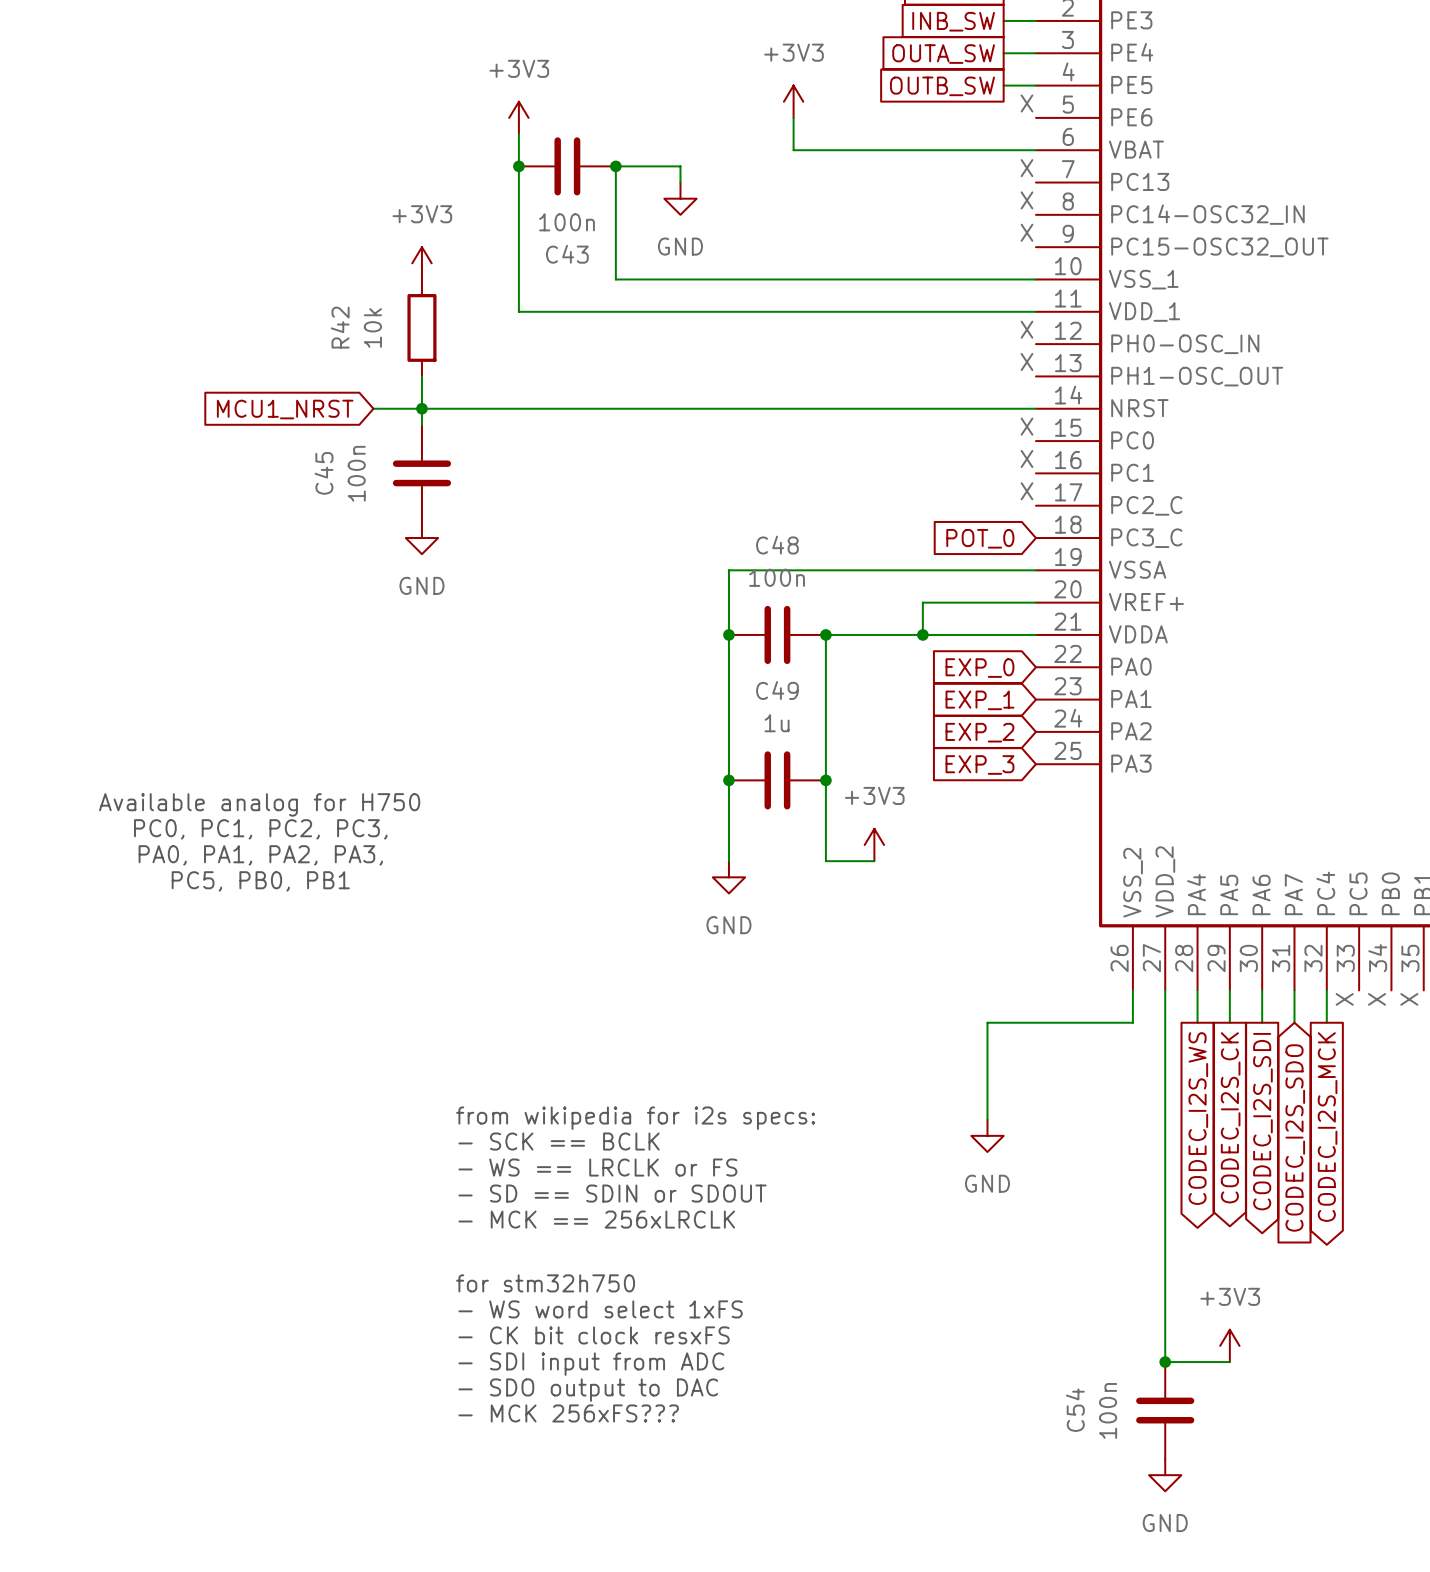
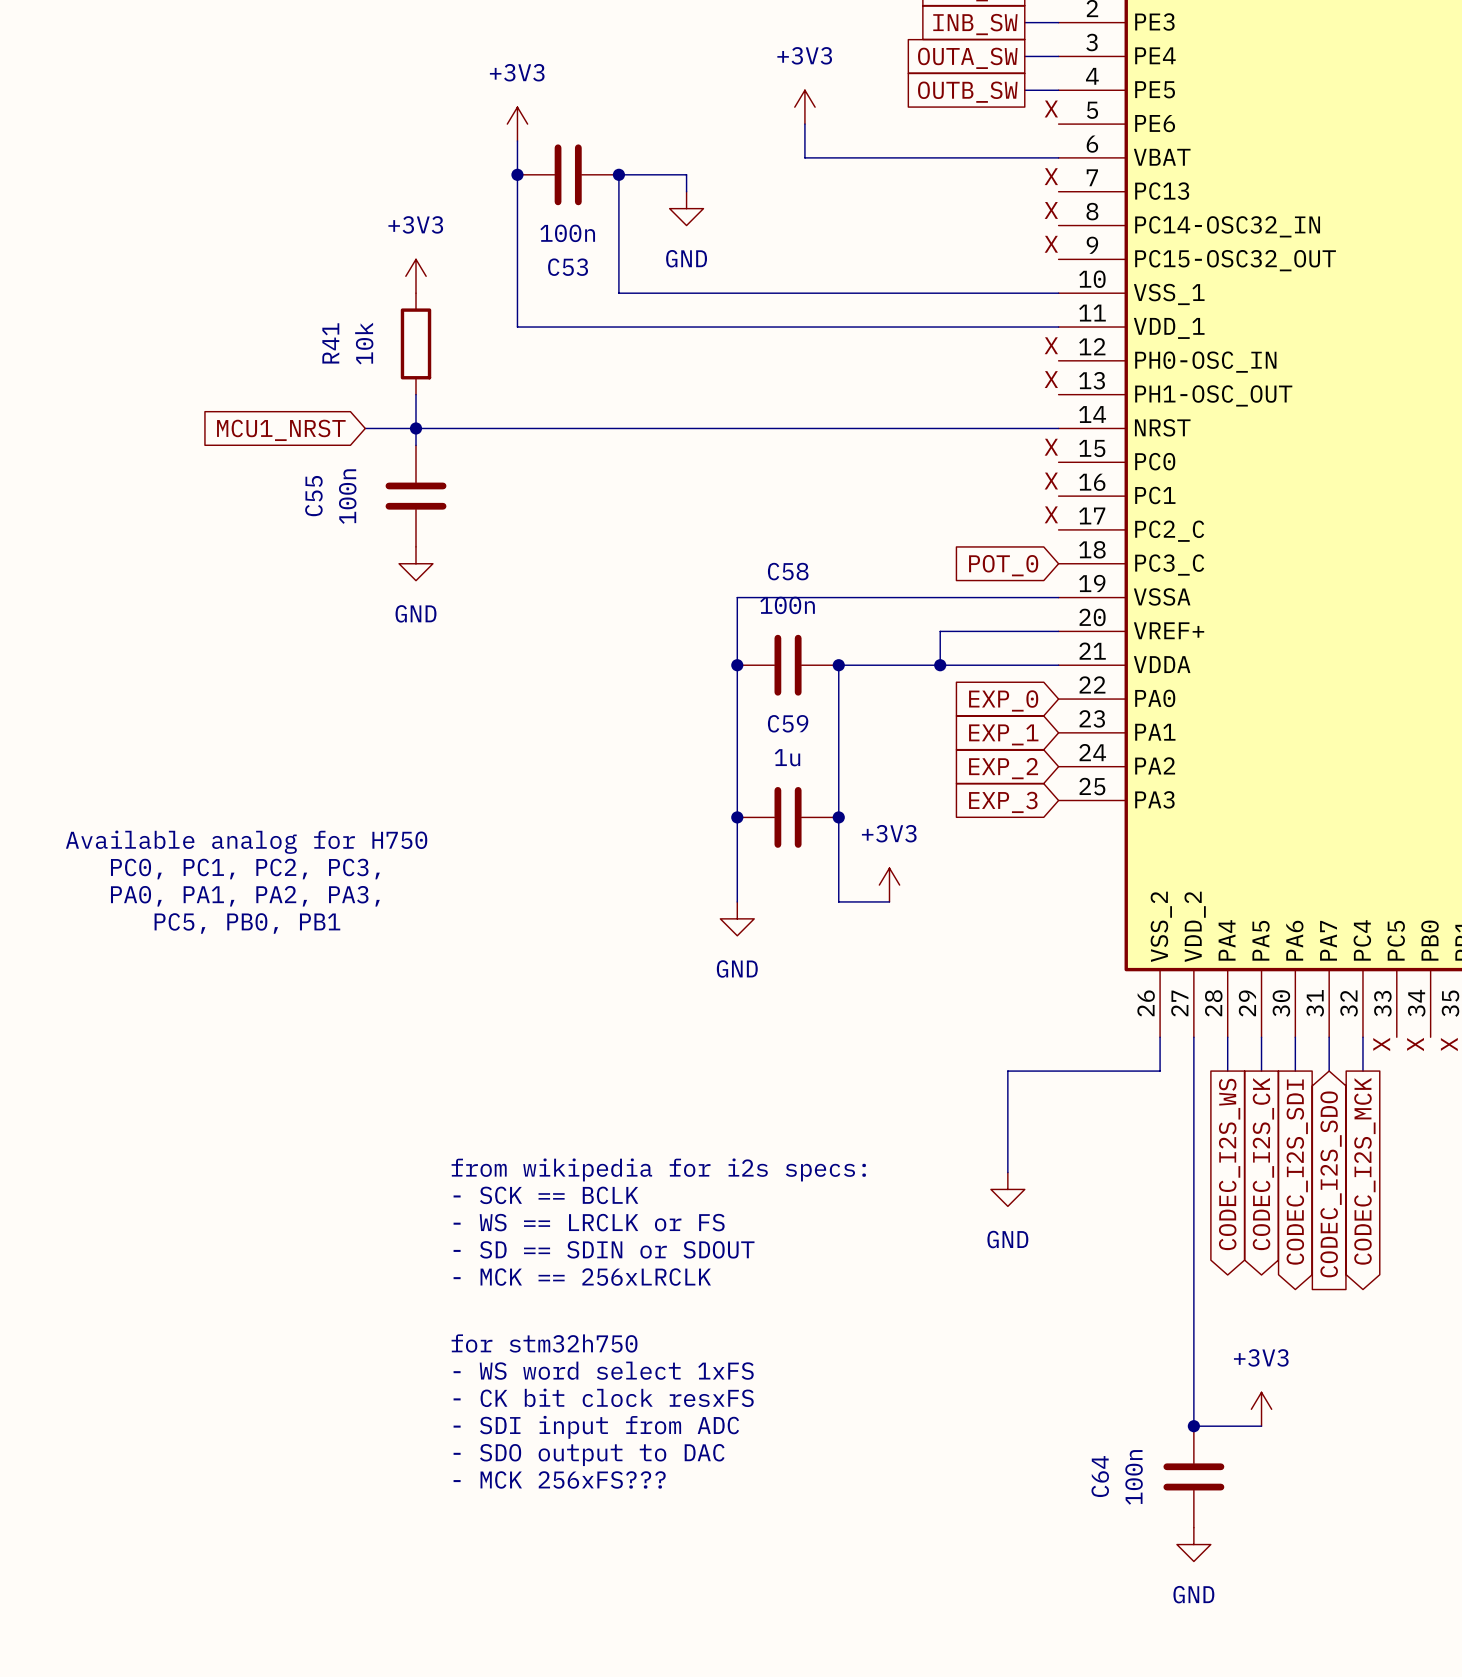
C43 name: C43 (567, 254) -> C53 (568, 267)
R42 name: R42 (340, 327) -> R41 (330, 343)
C45 name: C45 (324, 473) -> C55 (313, 496)
C48 name: C48 (777, 545) -> C58 (788, 571)
C49 name: C49 (777, 690) -> C59 (788, 723)
C54 name: C54 (1075, 1410) -> C64 (1100, 1476)

